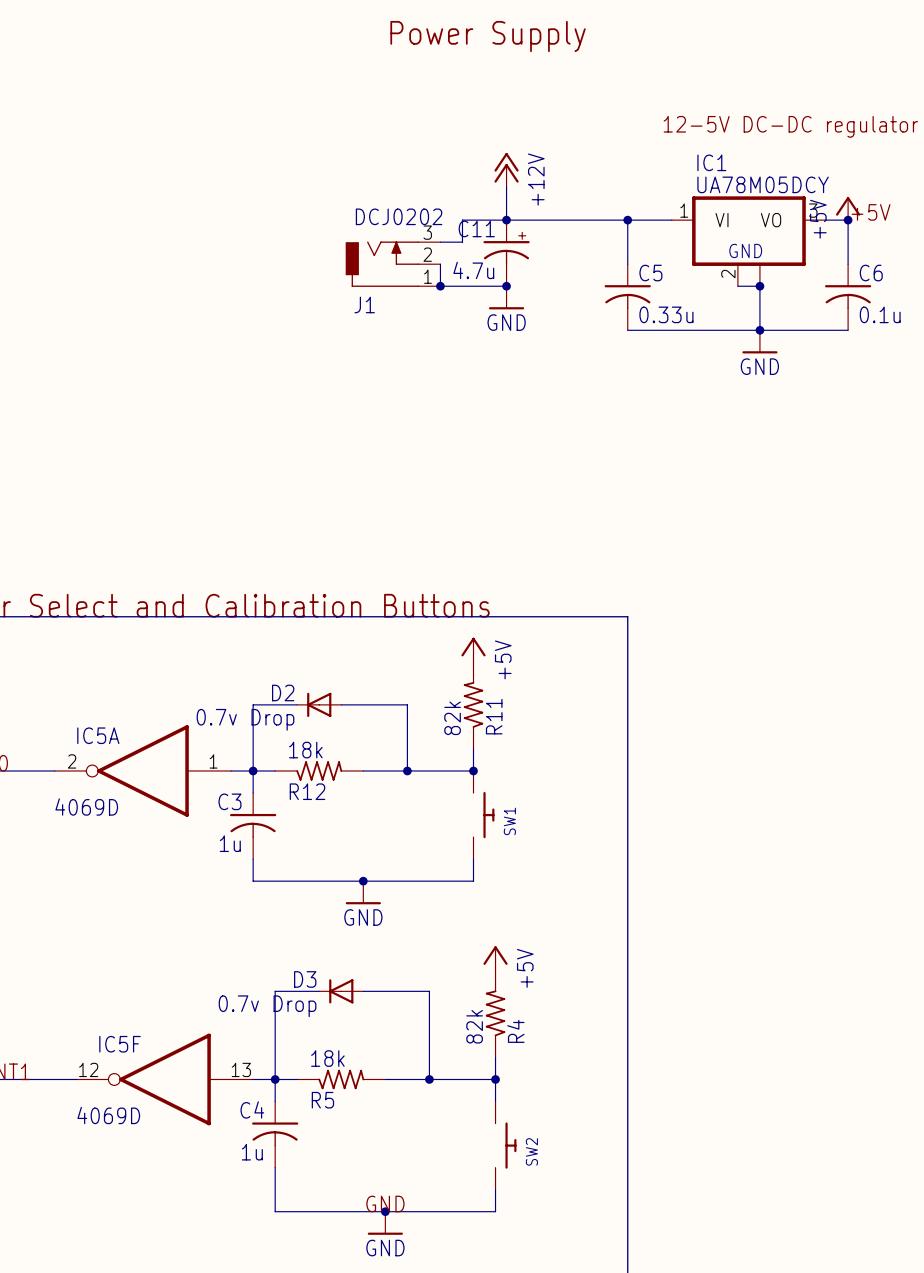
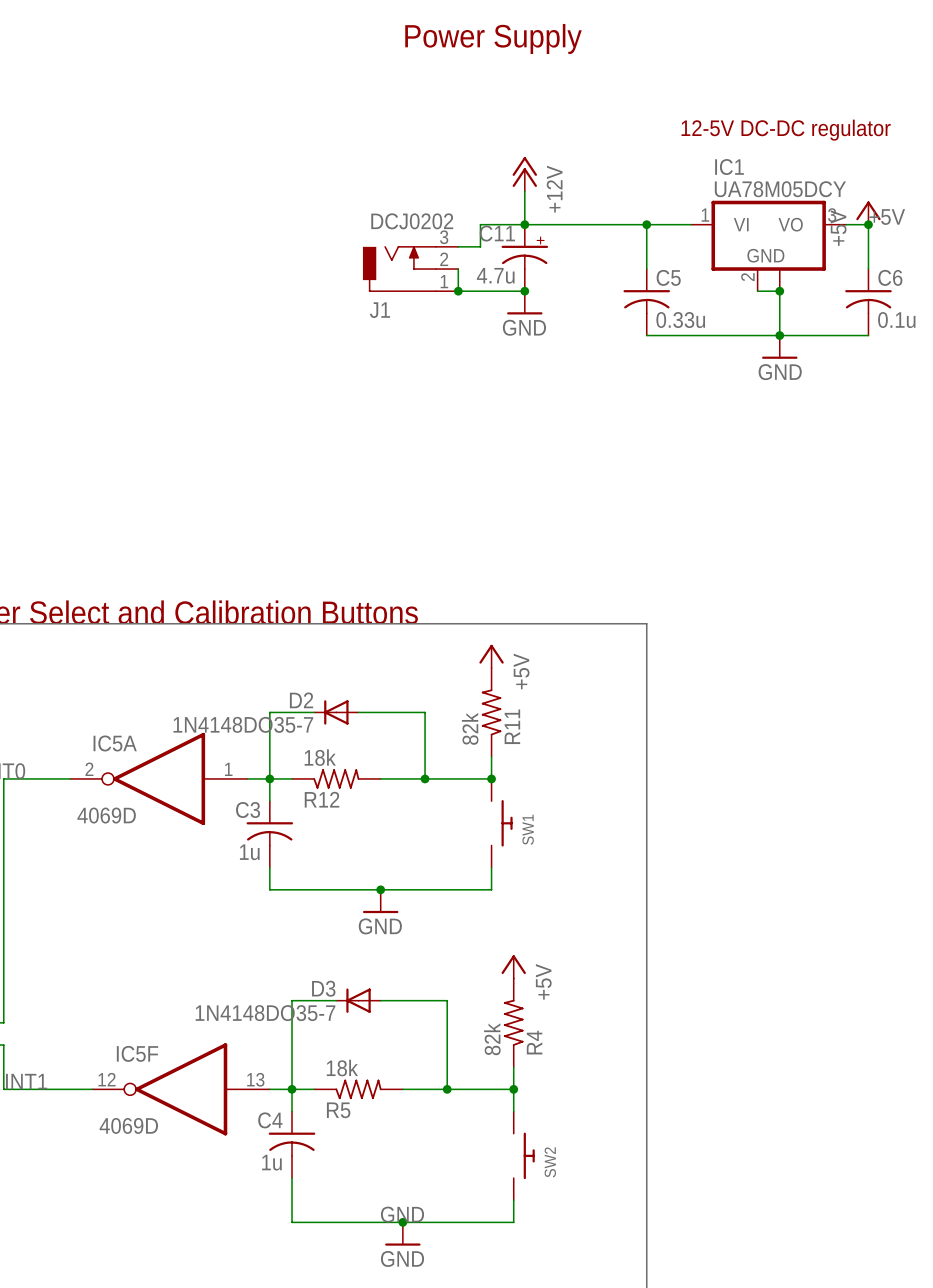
D2 value: 0.7v Drop (245, 719) -> 1N4148DO35-7 (243, 724)
D3 value: 0.7v Drop (267, 1006) -> 1N4148DO35-7 (265, 1013)

